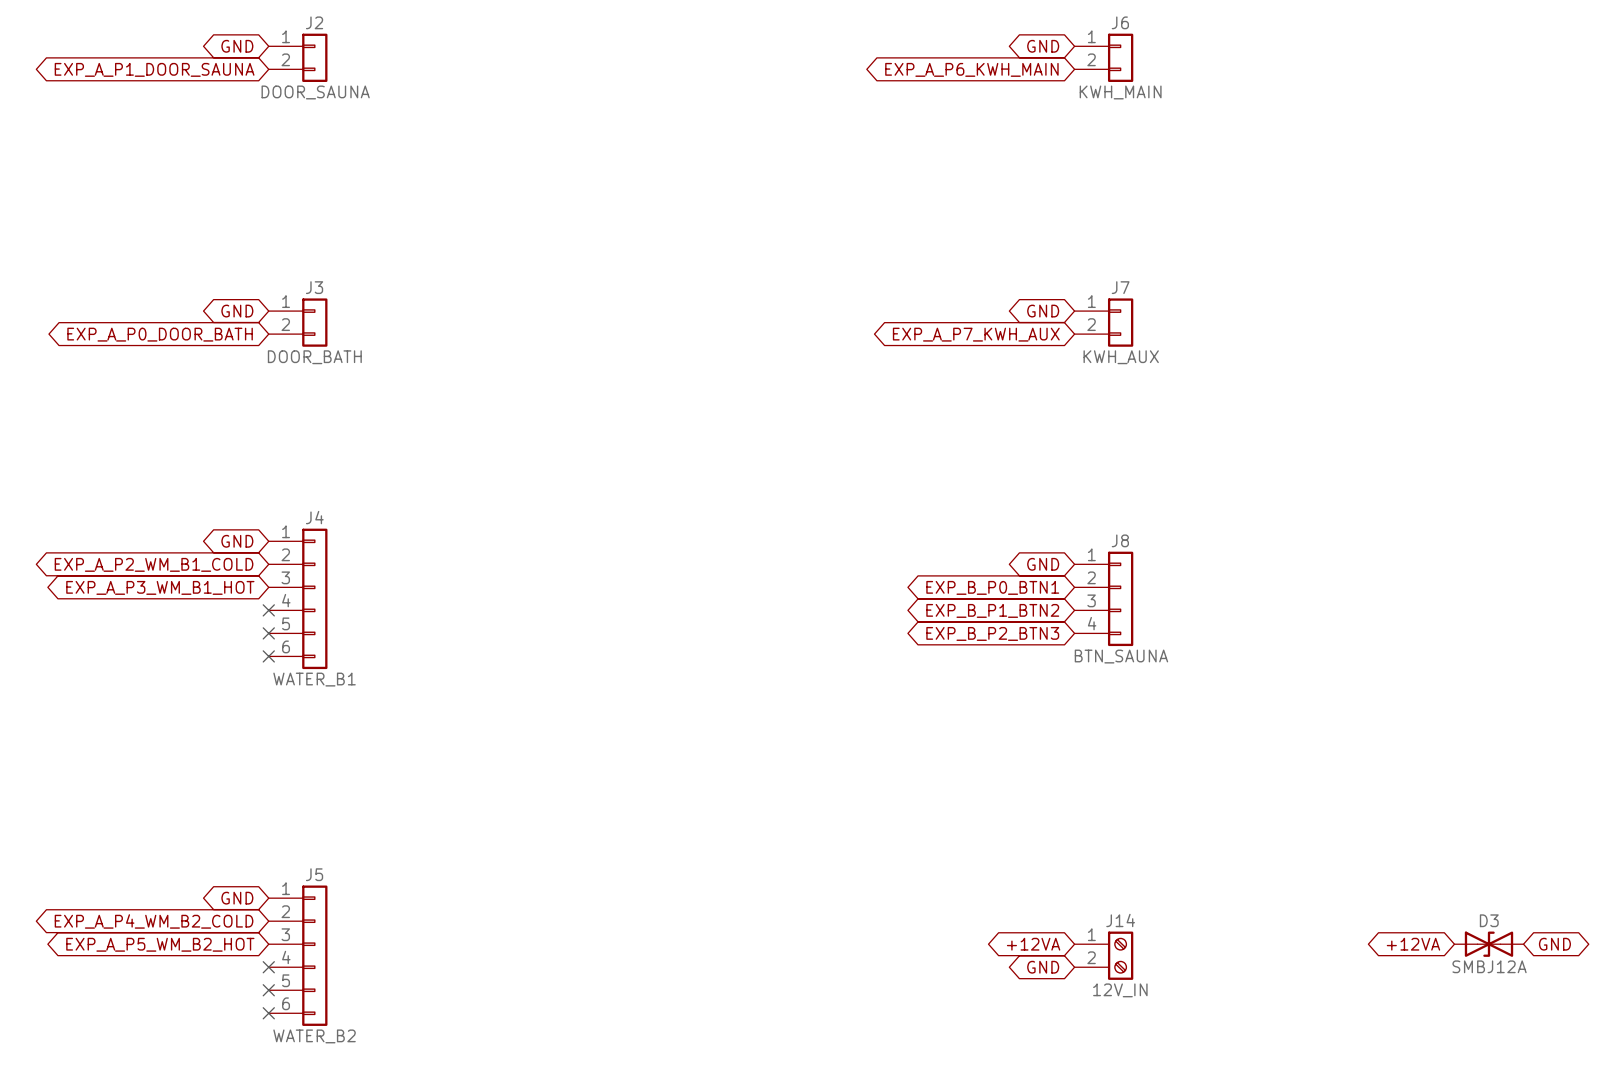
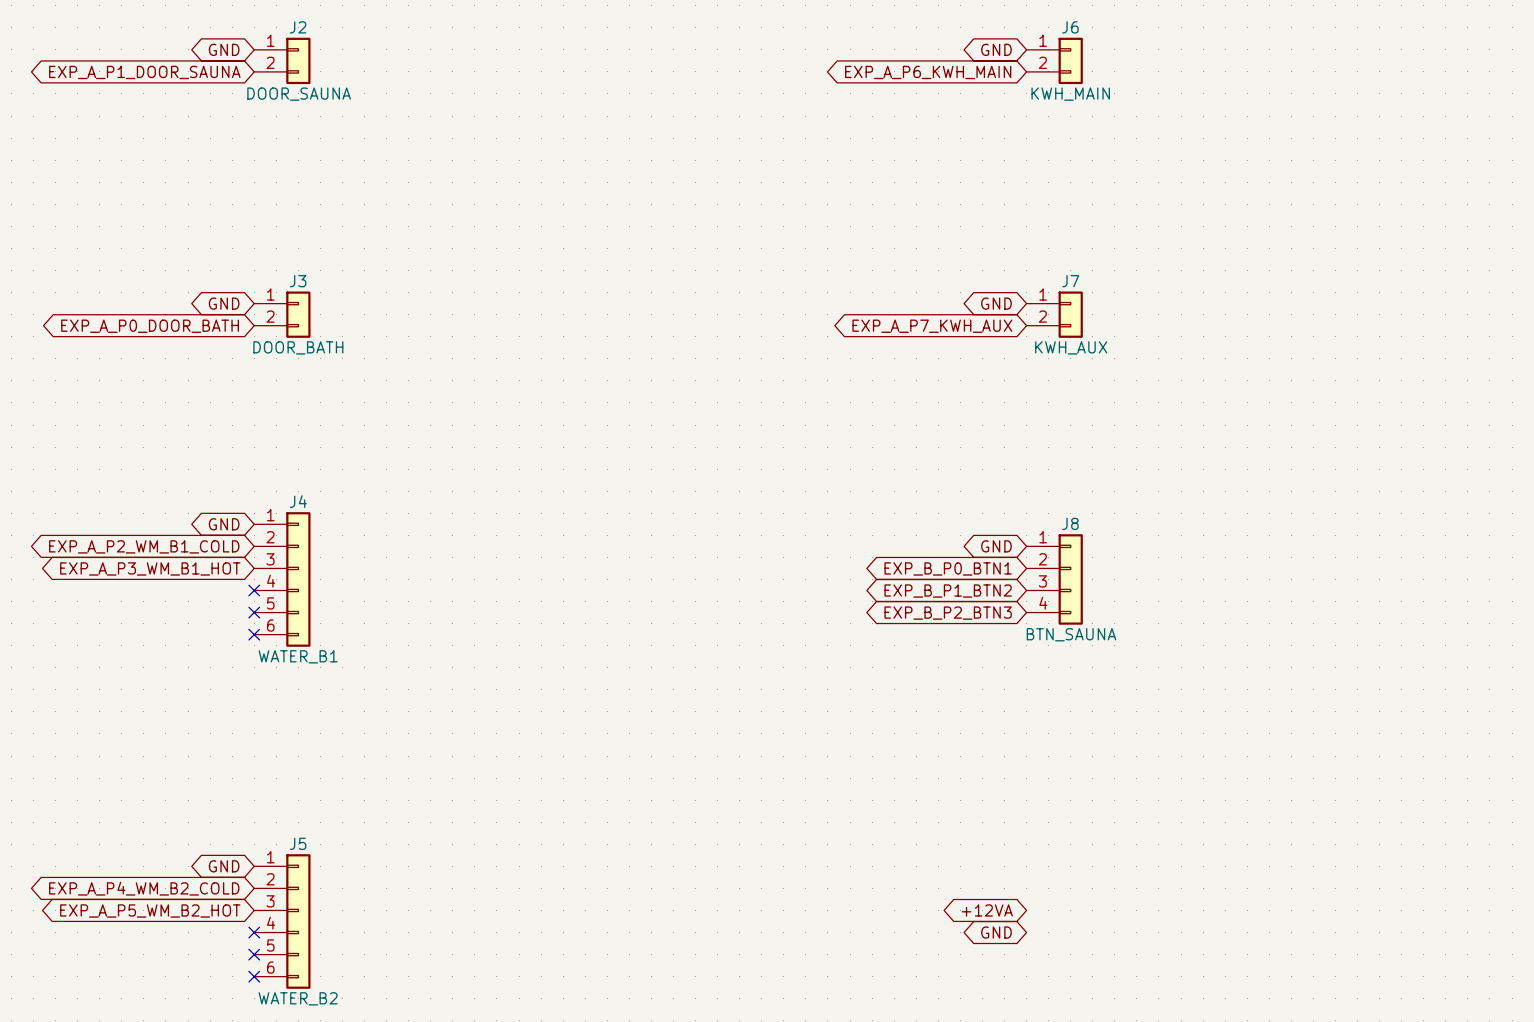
global label: +12VA (1413, 944) -> none
D3: SMBJ12A (1489, 944) -> none
global label: GND (1554, 944) -> none
J14: 12V_IN (1103, 955) -> none

